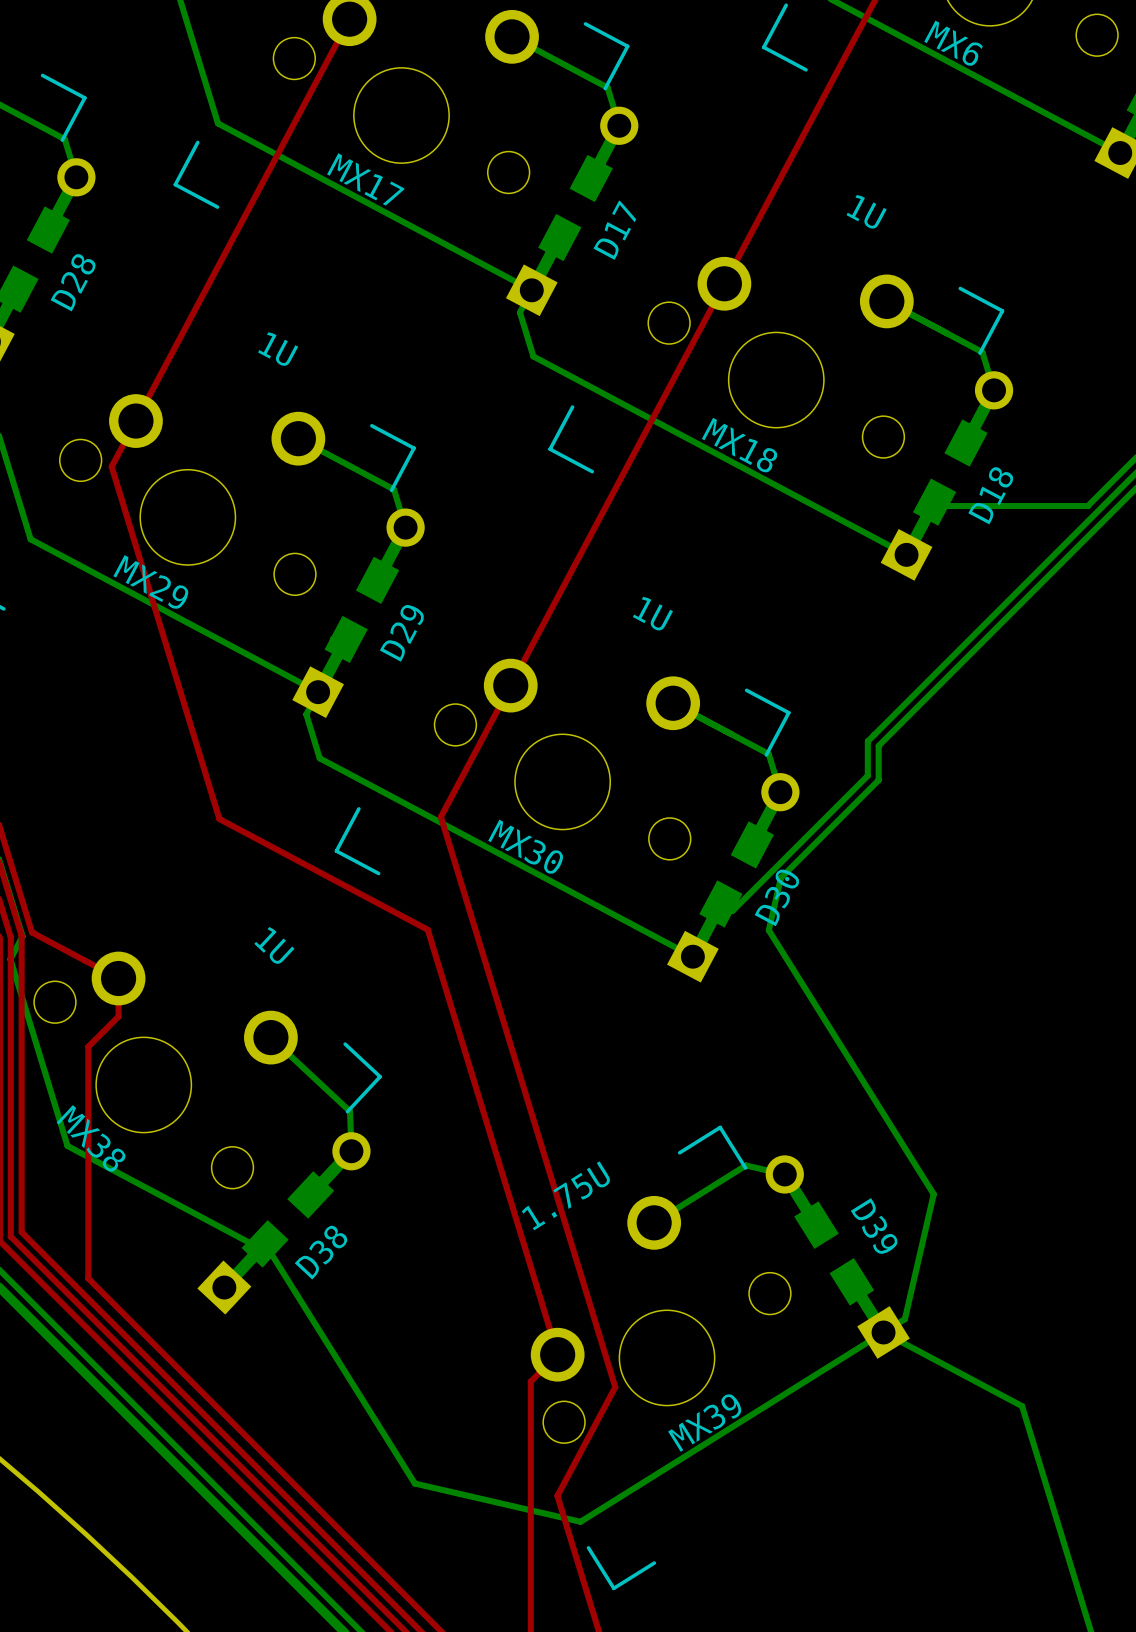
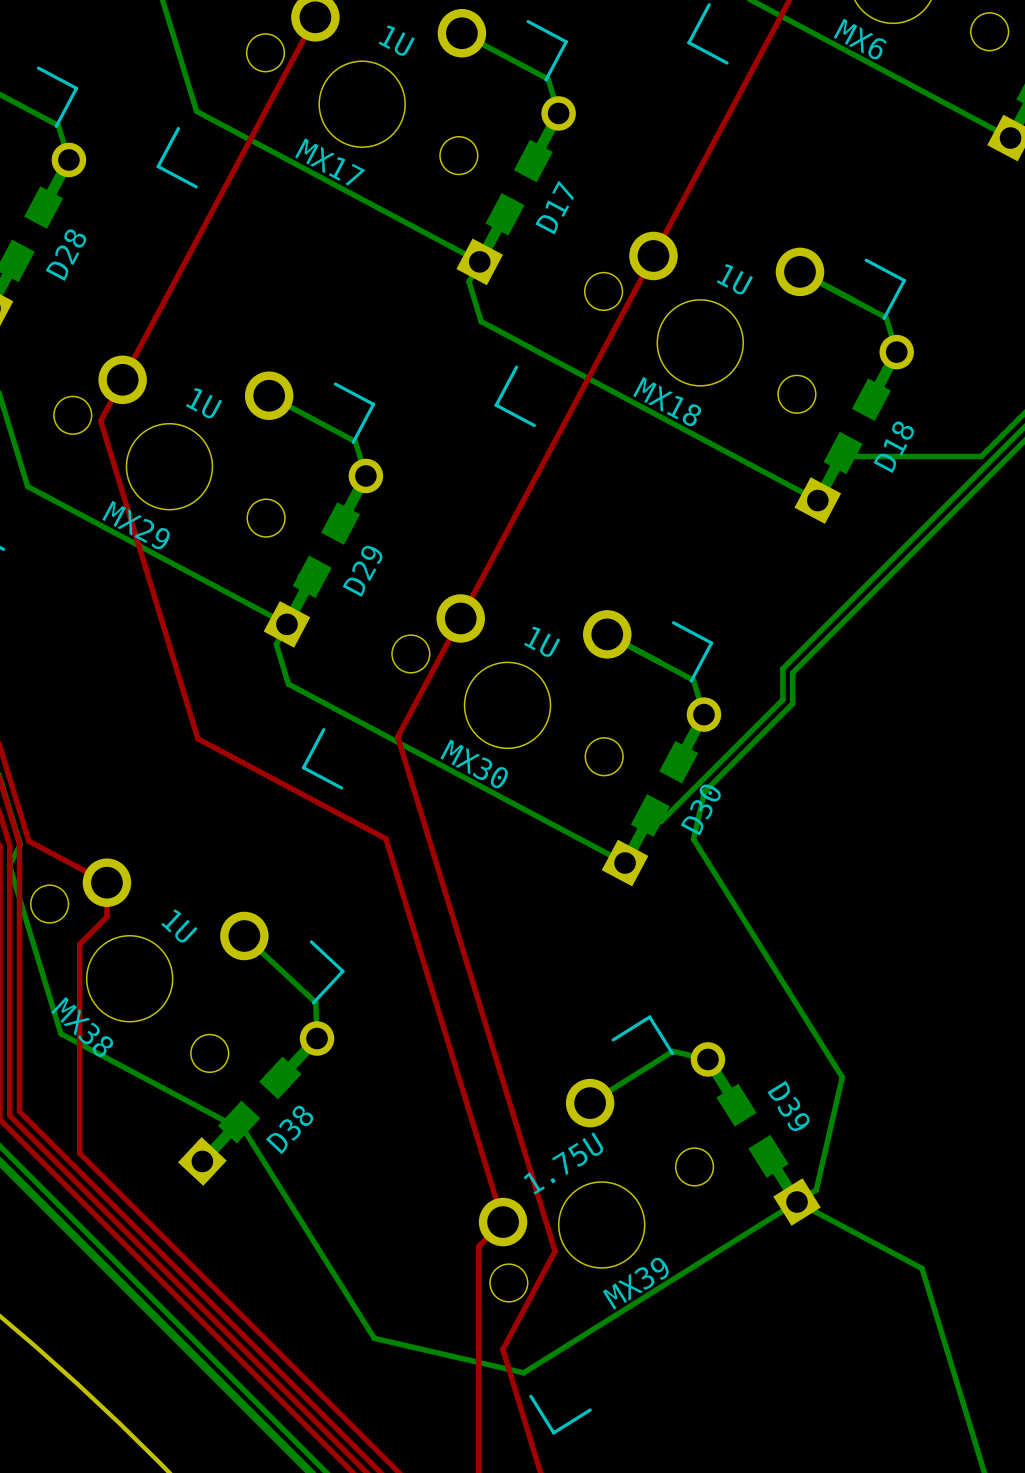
MX17 text: none -> 1U (396, 40)
MX18 value: 1U (866, 211) -> none
MX18 text: none -> 1U (734, 279)
MX29 value: 1U (278, 349) -> none
MX29 text: none -> 1U (204, 403)
MX30 value: 1U (652, 613) -> none
MX30 text: none -> 1U (542, 641)
MX38 value: 1U (274, 945) -> none
MX38 text: none -> 1U (179, 925)
MX39 value: 1.75U (566, 1195) -> none
MX39 text: none -> 1.75U (563, 1163)

